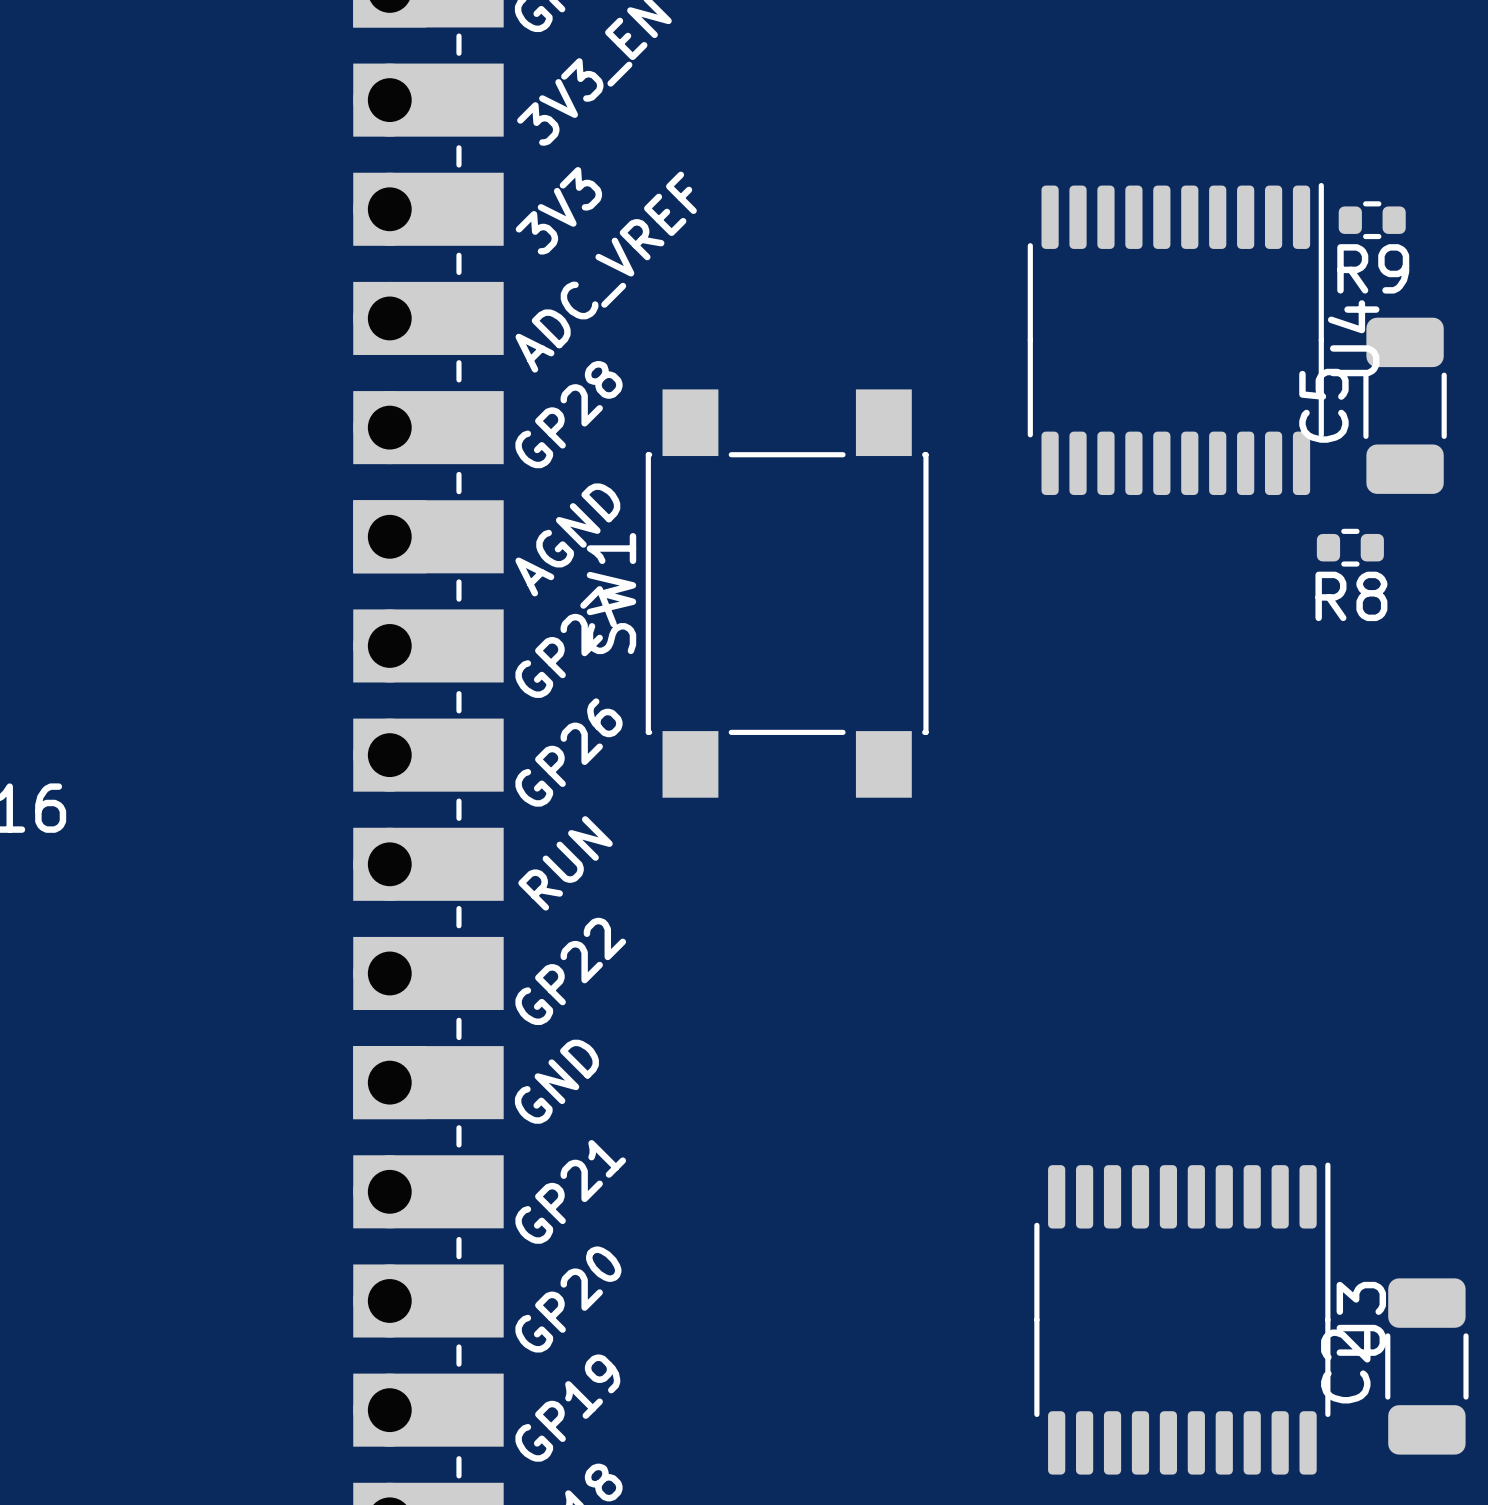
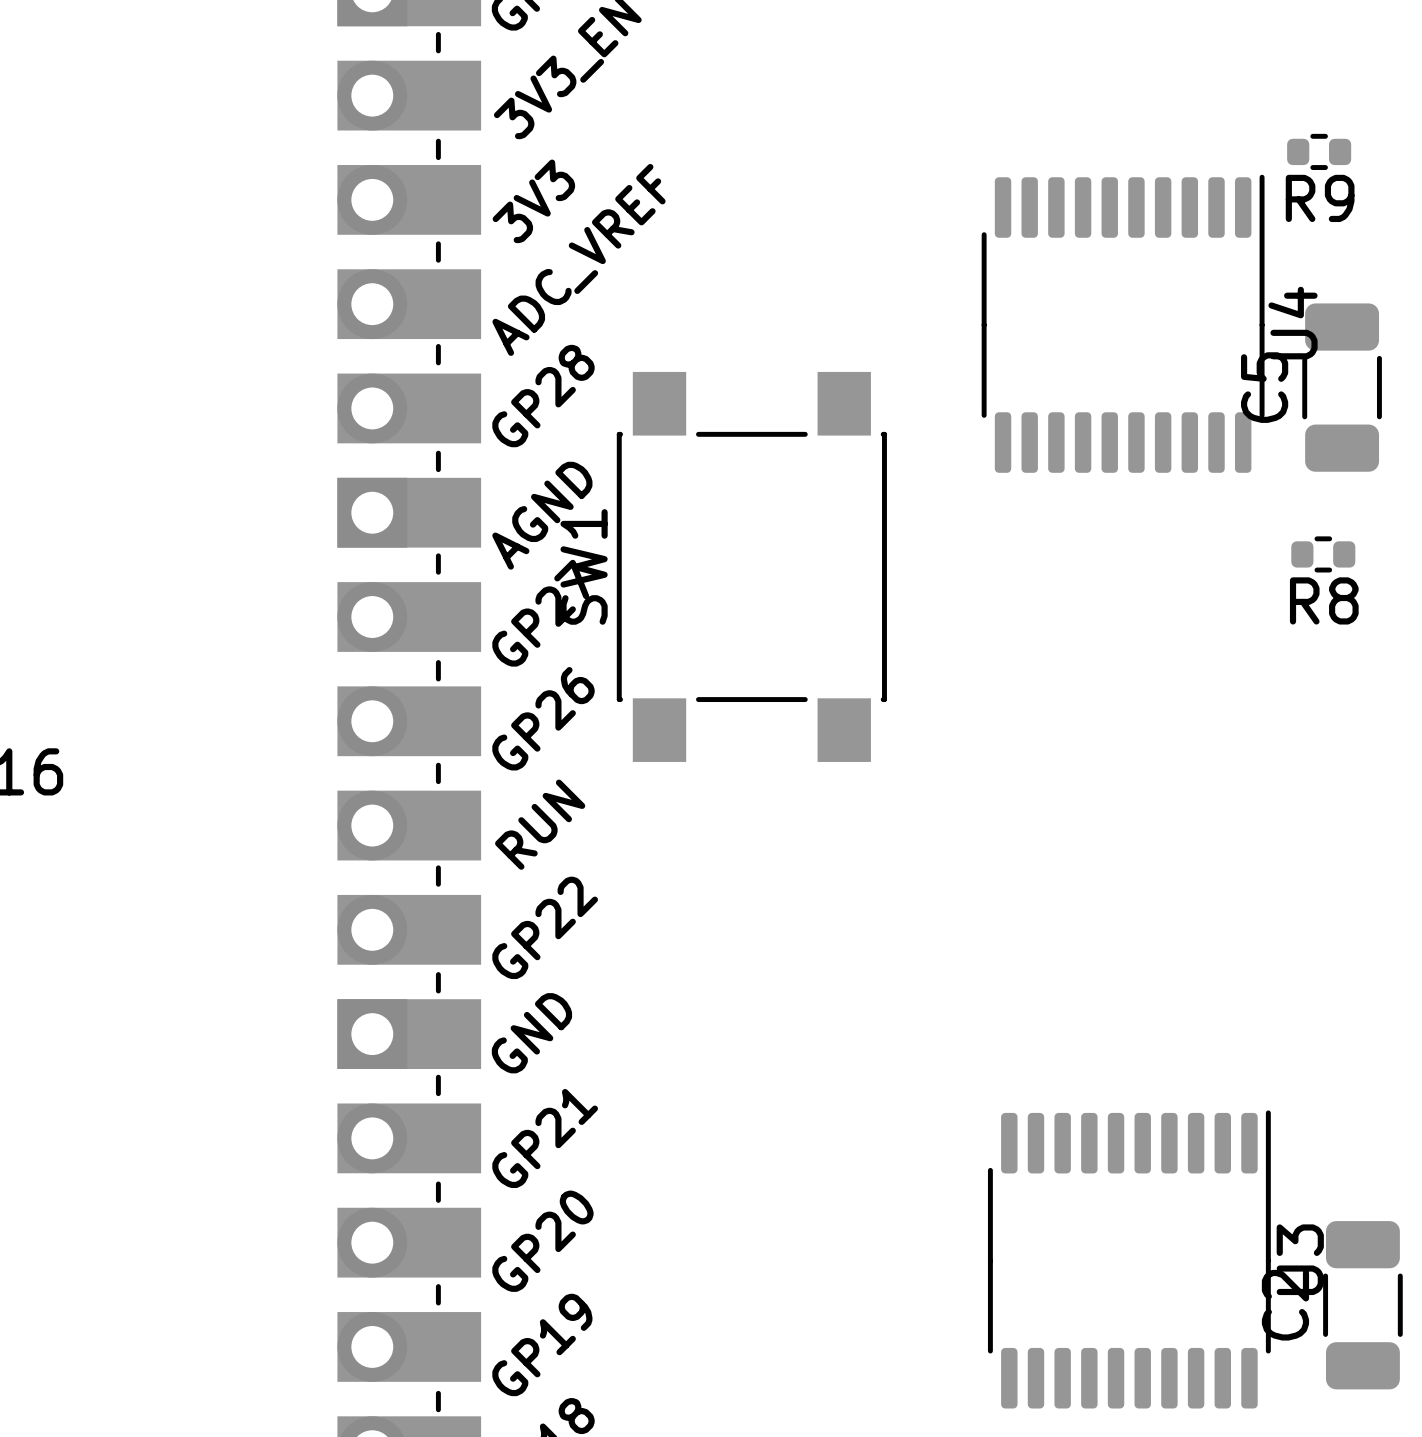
R9 position: (1372, 220) -> (1319, 151)
R8 position: (1350, 547) -> (1323, 554)

